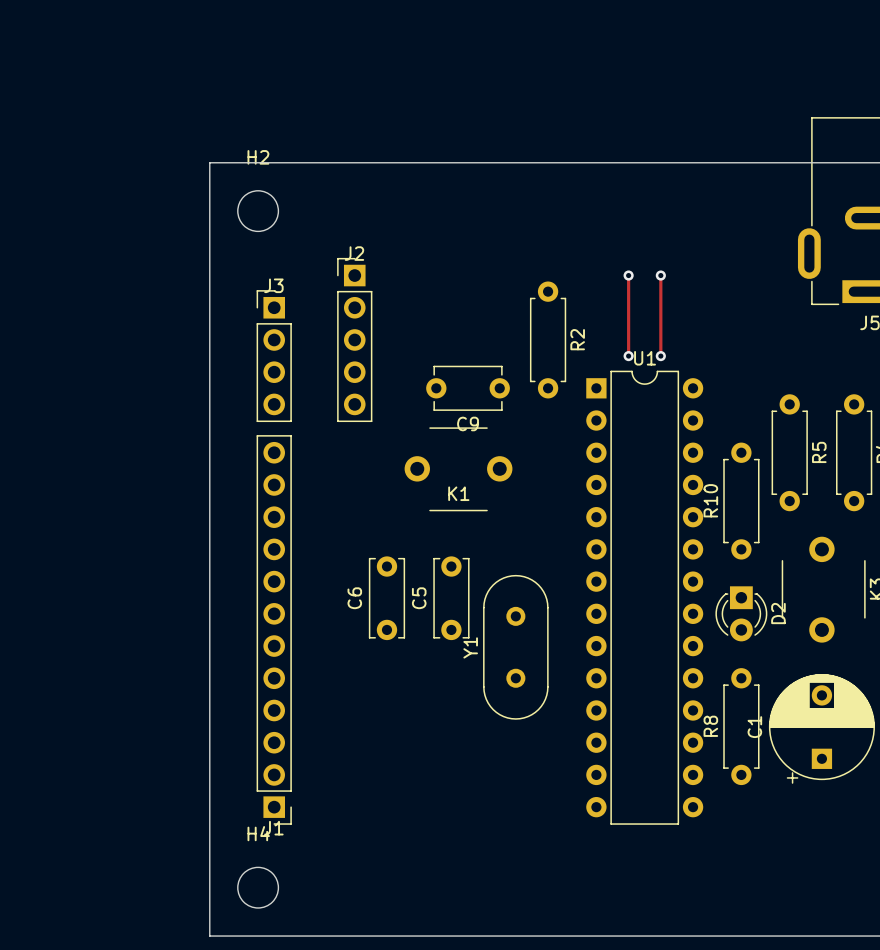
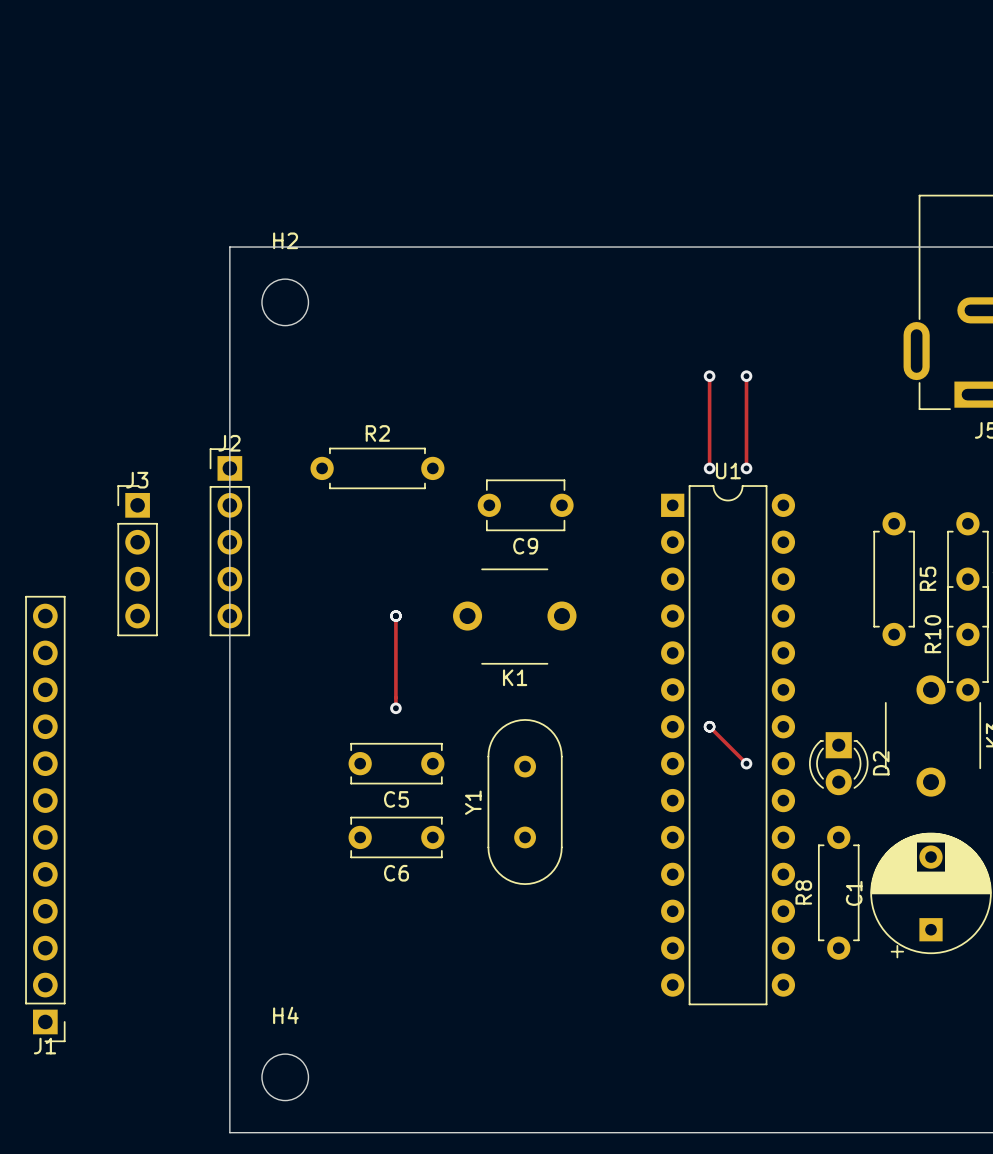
J2 position: (354, 339) -> (229, 542)
R2 rotation: 0° (548, 339) -> 90° clockwise (377, 468)
R2 position: (548, 339) -> (377, 468)
R2 name position: R2 (577, 339) -> R2 (377, 433)
J3 position: (274, 356) -> (137, 560)
K1 position: (458, 469) -> (514, 616)
track: none -> (395, 616) (395, 708)
via: none -> (395, 616)
K1 name position: K1 (458, 493) -> K1 (515, 677)
R10 position: (741, 501) -> (967, 634)
via: none -> (395, 708)
track: none -> (709, 726) (746, 763)
via: none -> (709, 726)
C6 name position: C6 (354, 598) -> C6 (396, 873)
C6 rotation: 0° (386, 598) -> 90° clockwise (396, 837)
C6 position: (386, 598) -> (396, 837)
C5 name position: C5 (419, 598) -> C5 (396, 799)
C5 rotation: 0° (451, 598) -> 90° clockwise (396, 763)
C5 position: (451, 598) -> (396, 763)
via: none -> (746, 763)
J1 position: (274, 629) -> (45, 819)
Y1 position: (515, 647) -> (525, 802)

